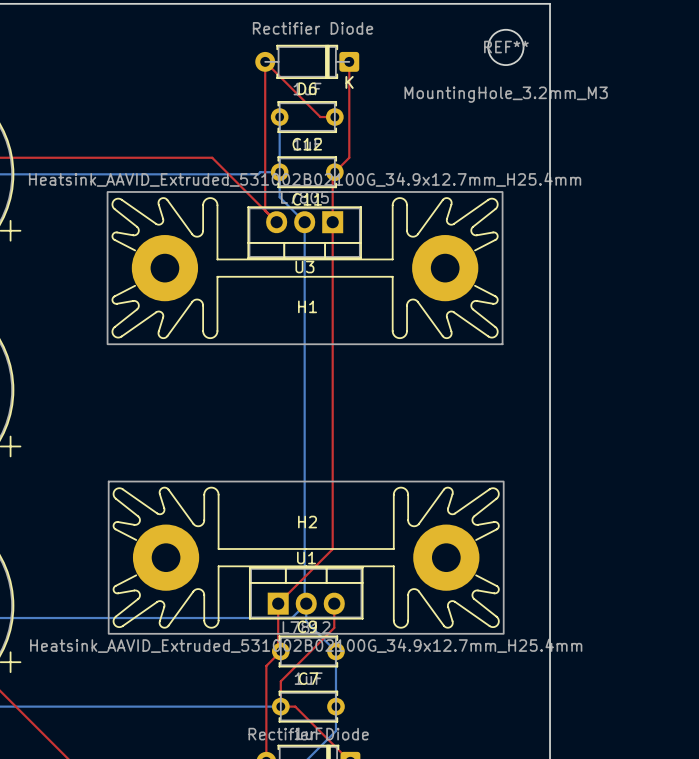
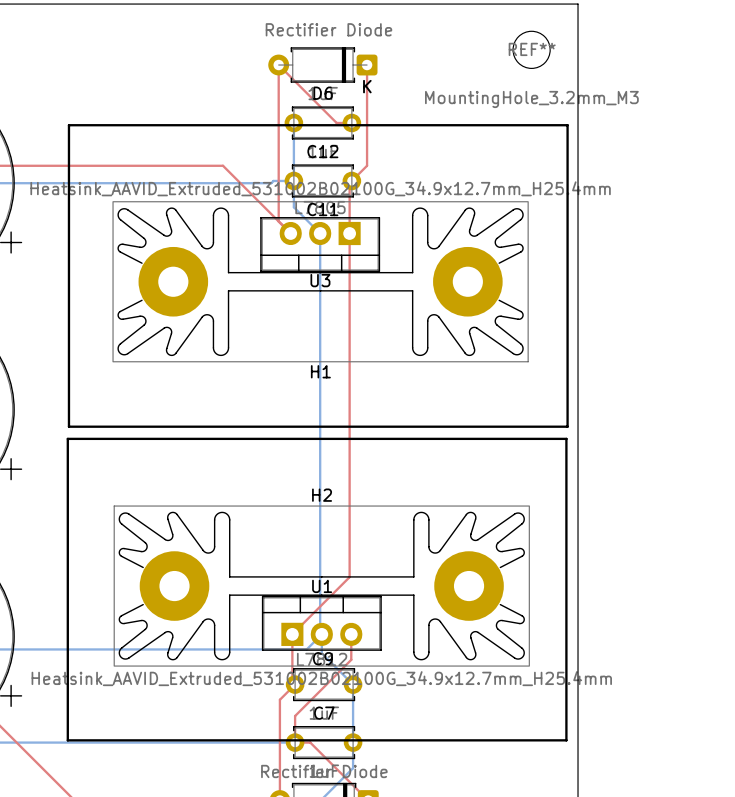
line: none -> (68, 125) (567, 125) (567, 426) (68, 426) (68, 125)
H1 name position: H1 (307, 306) -> H1 (320, 371)
line: none -> (67, 438) (566, 438) (566, 740) (67, 740) (67, 438)
H2 name position: H2 (307, 522) -> H2 (322, 495)

